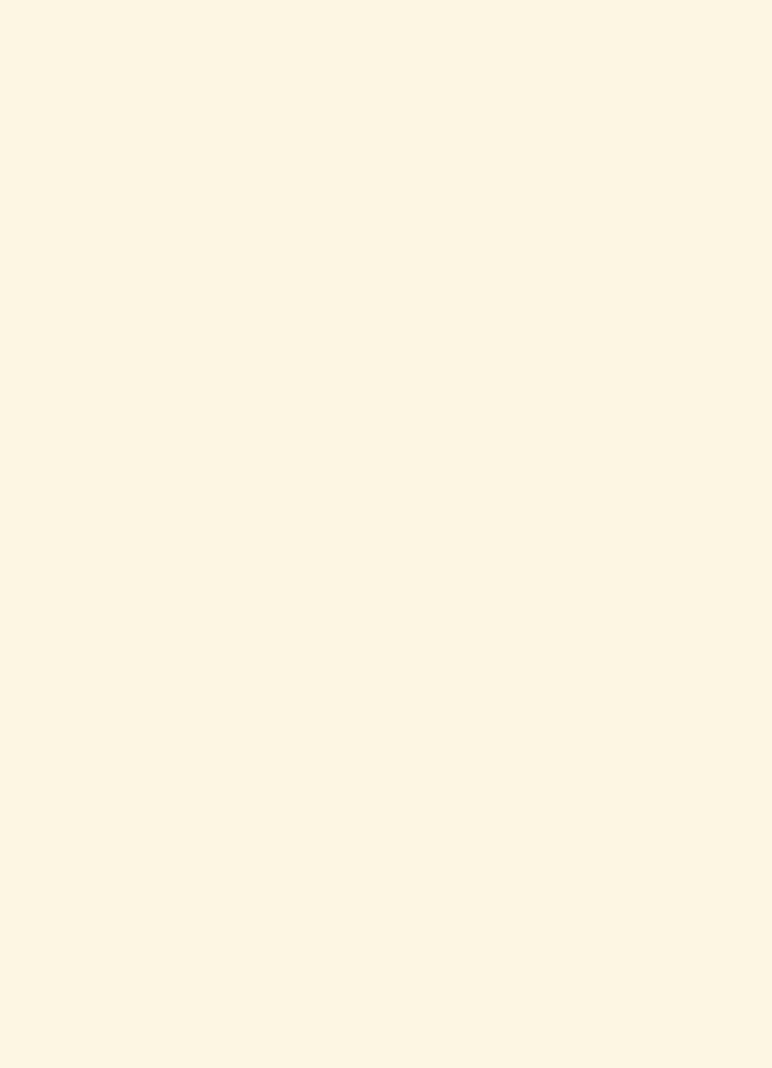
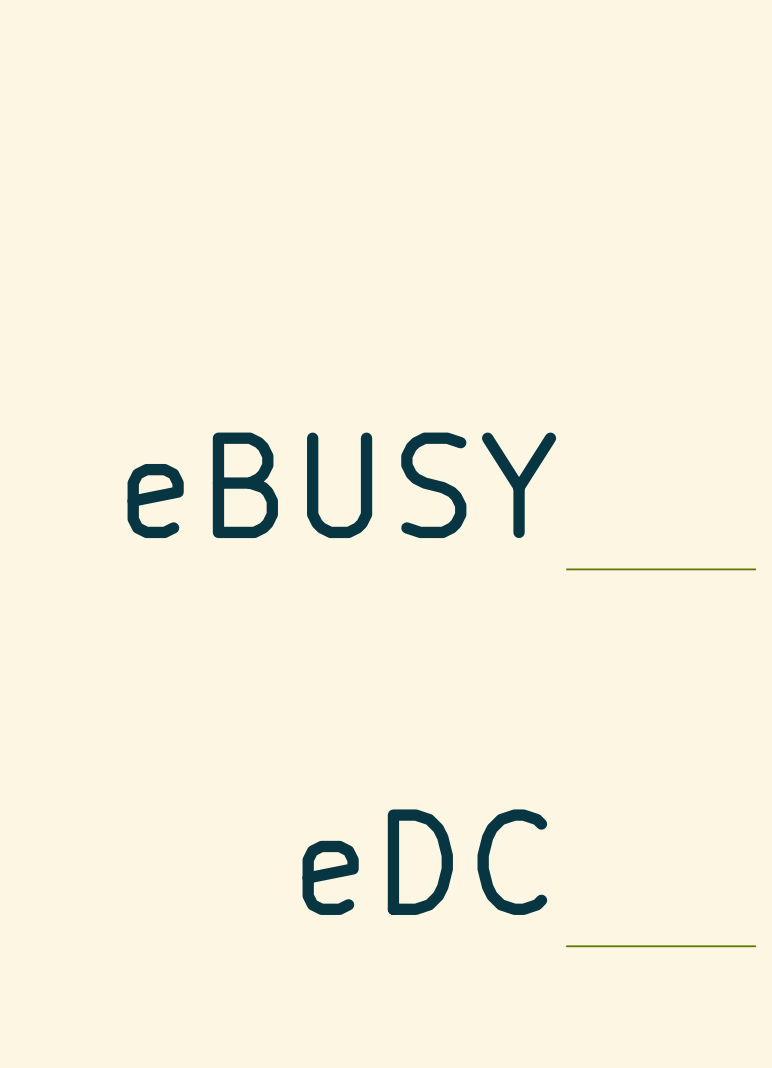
label: none -> eBUSY (341, 485)
wire: none -> (566, 569) (755, 569)
label: none -> eDC (424, 862)
wire: none -> (566, 946) (755, 946)

